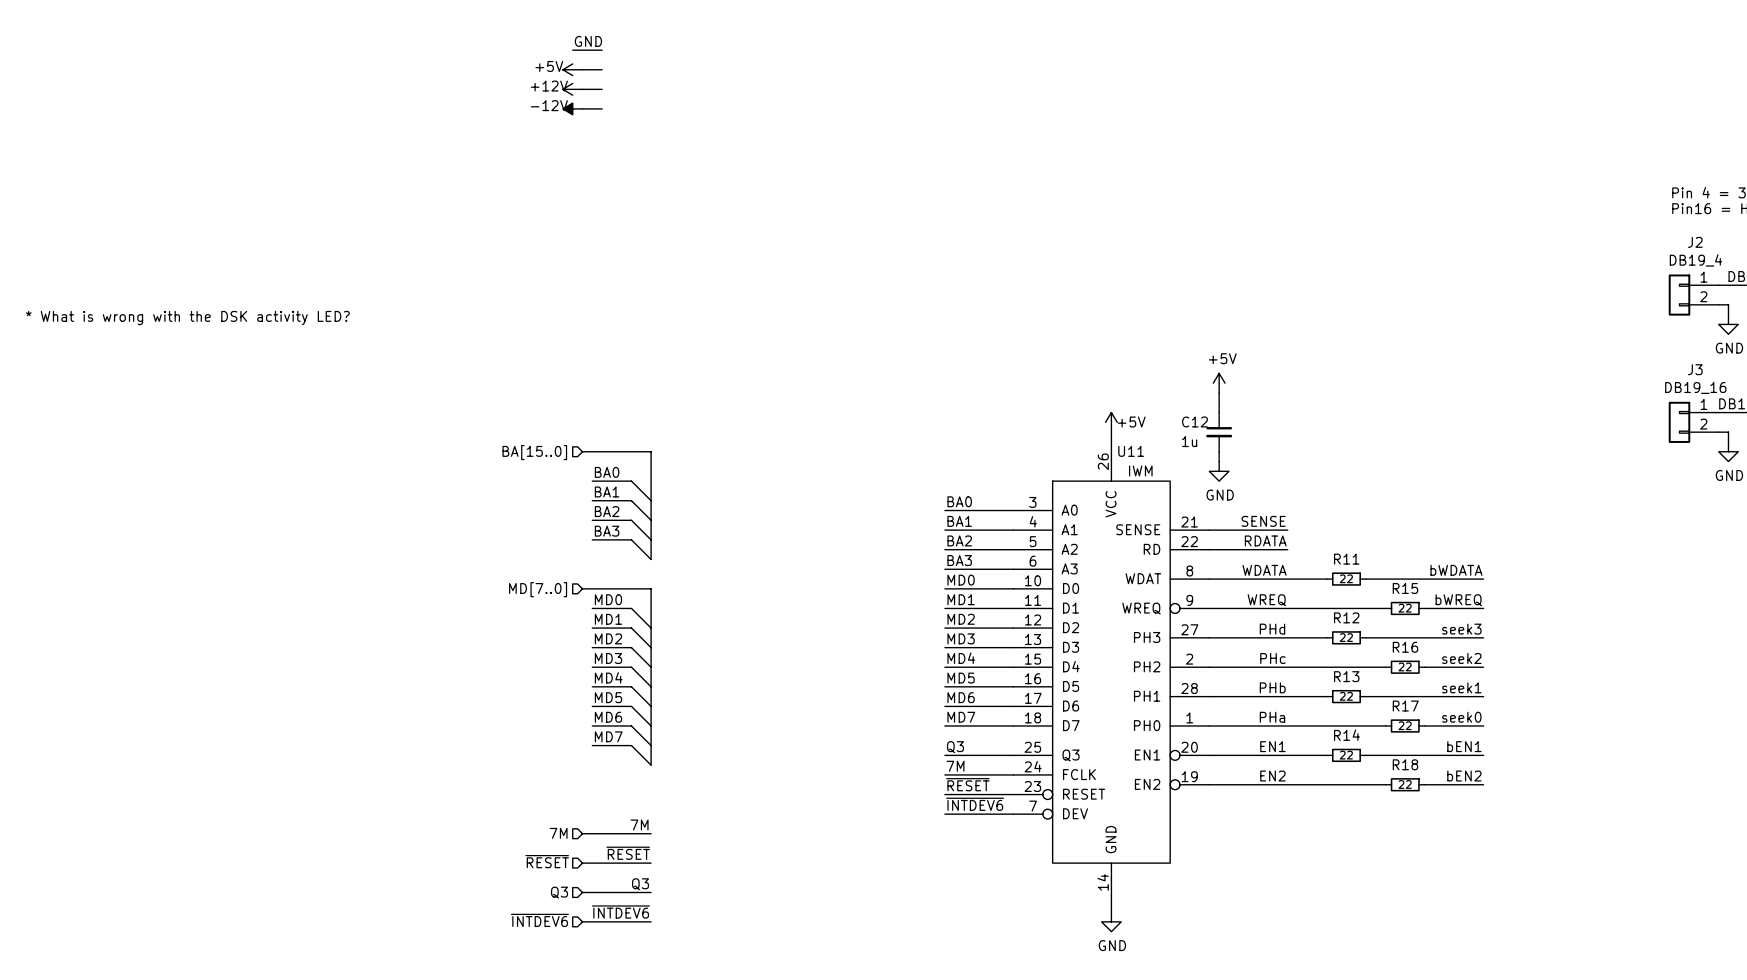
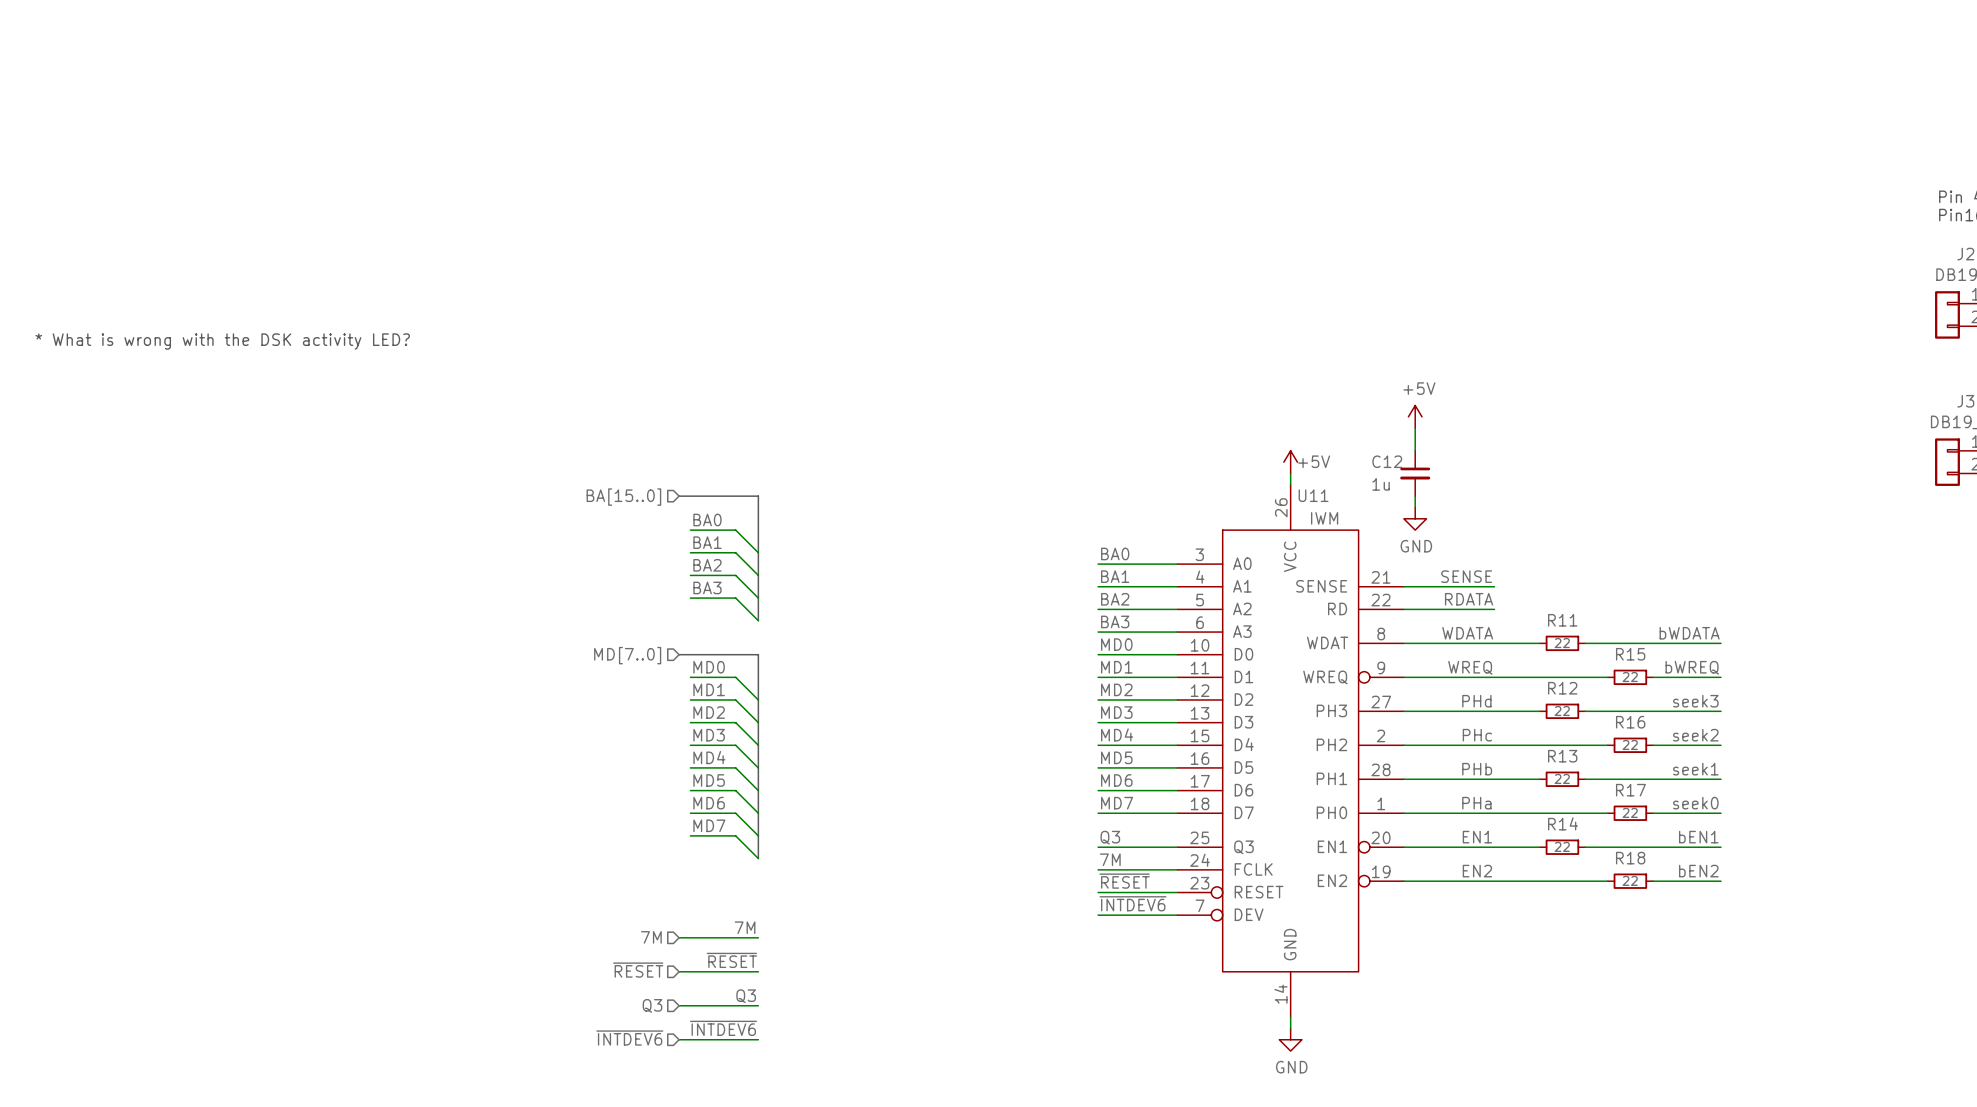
label: GND (588, 41) -> none
wire: (572, 50) (602, 50) -> none
power symbol: +5V (572, 69) -> none
wire: (582, 69) (602, 69) -> none
power symbol: +12V (572, 89) -> none
wire: (582, 89) (602, 89) -> none
power symbol: -12V (572, 108) -> none
wire: (582, 108) (602, 108) -> none

